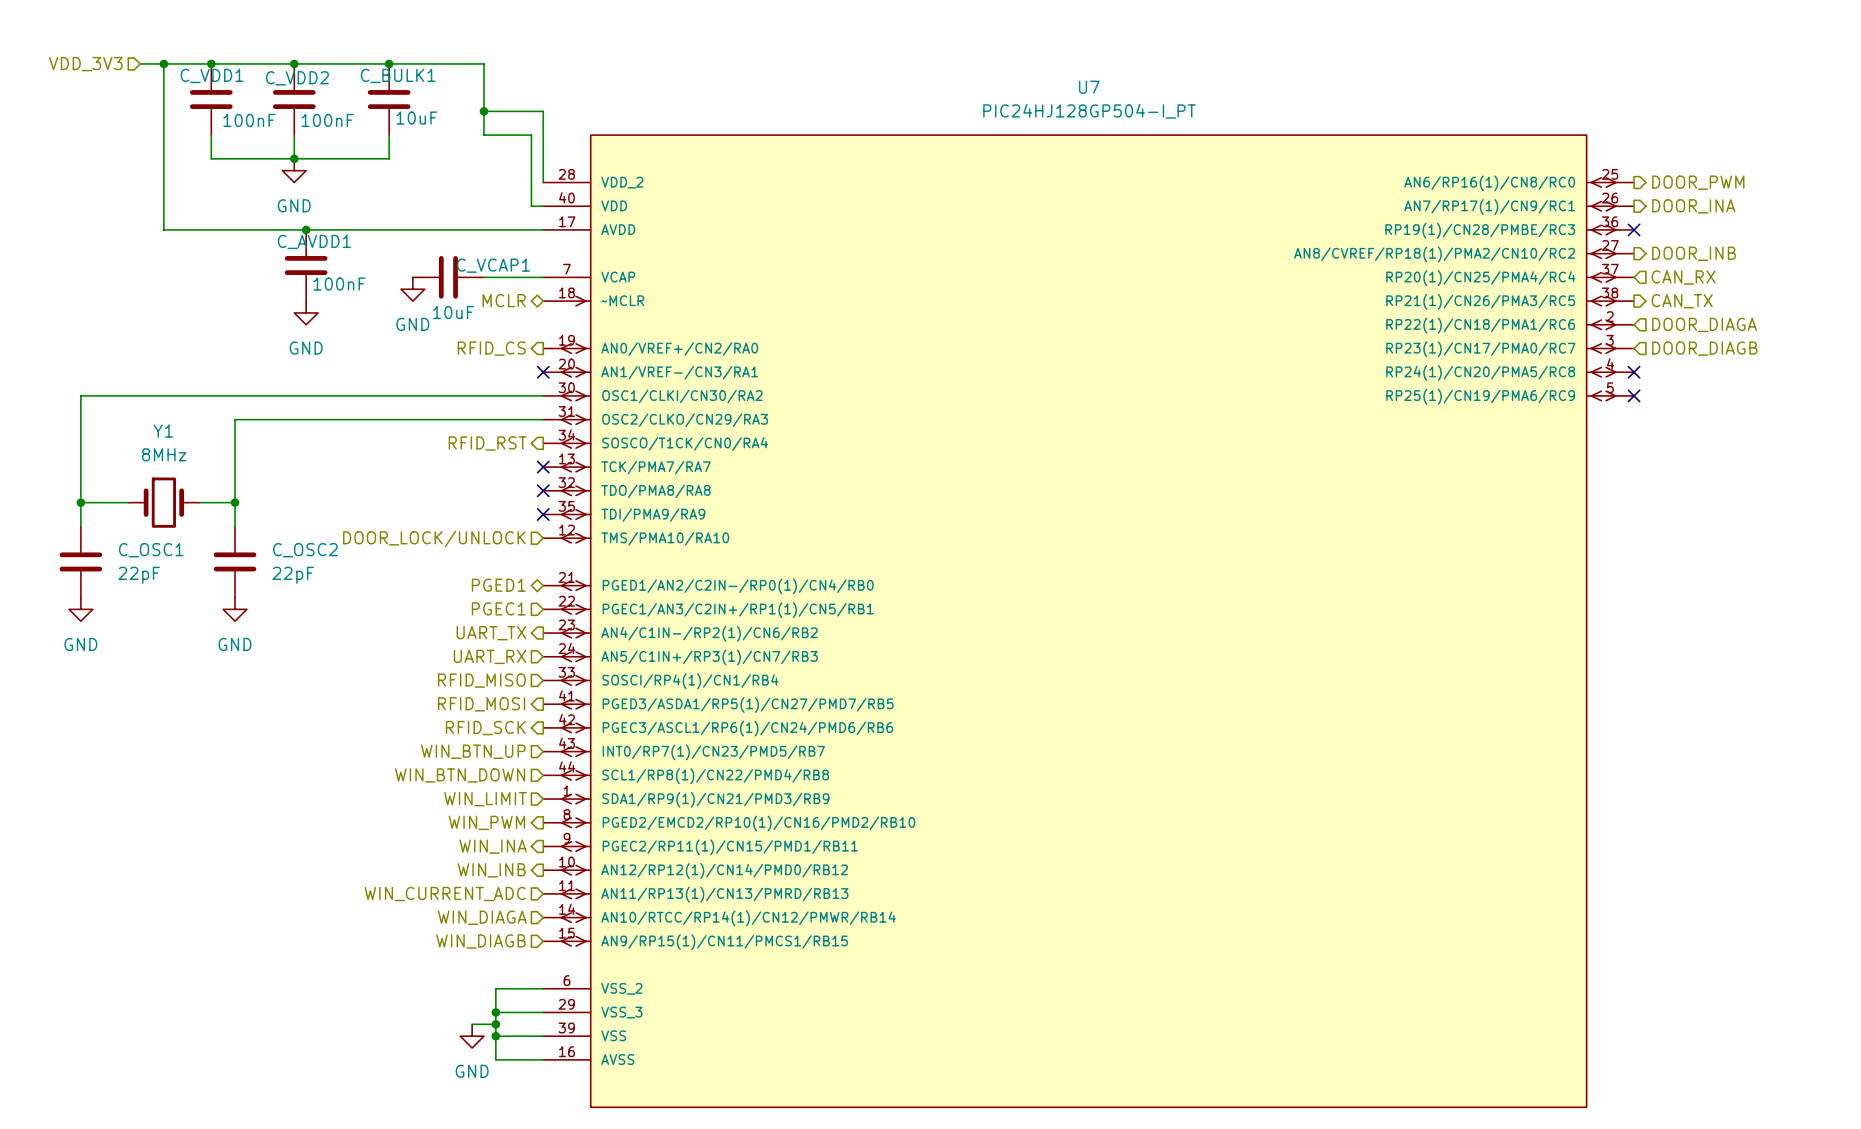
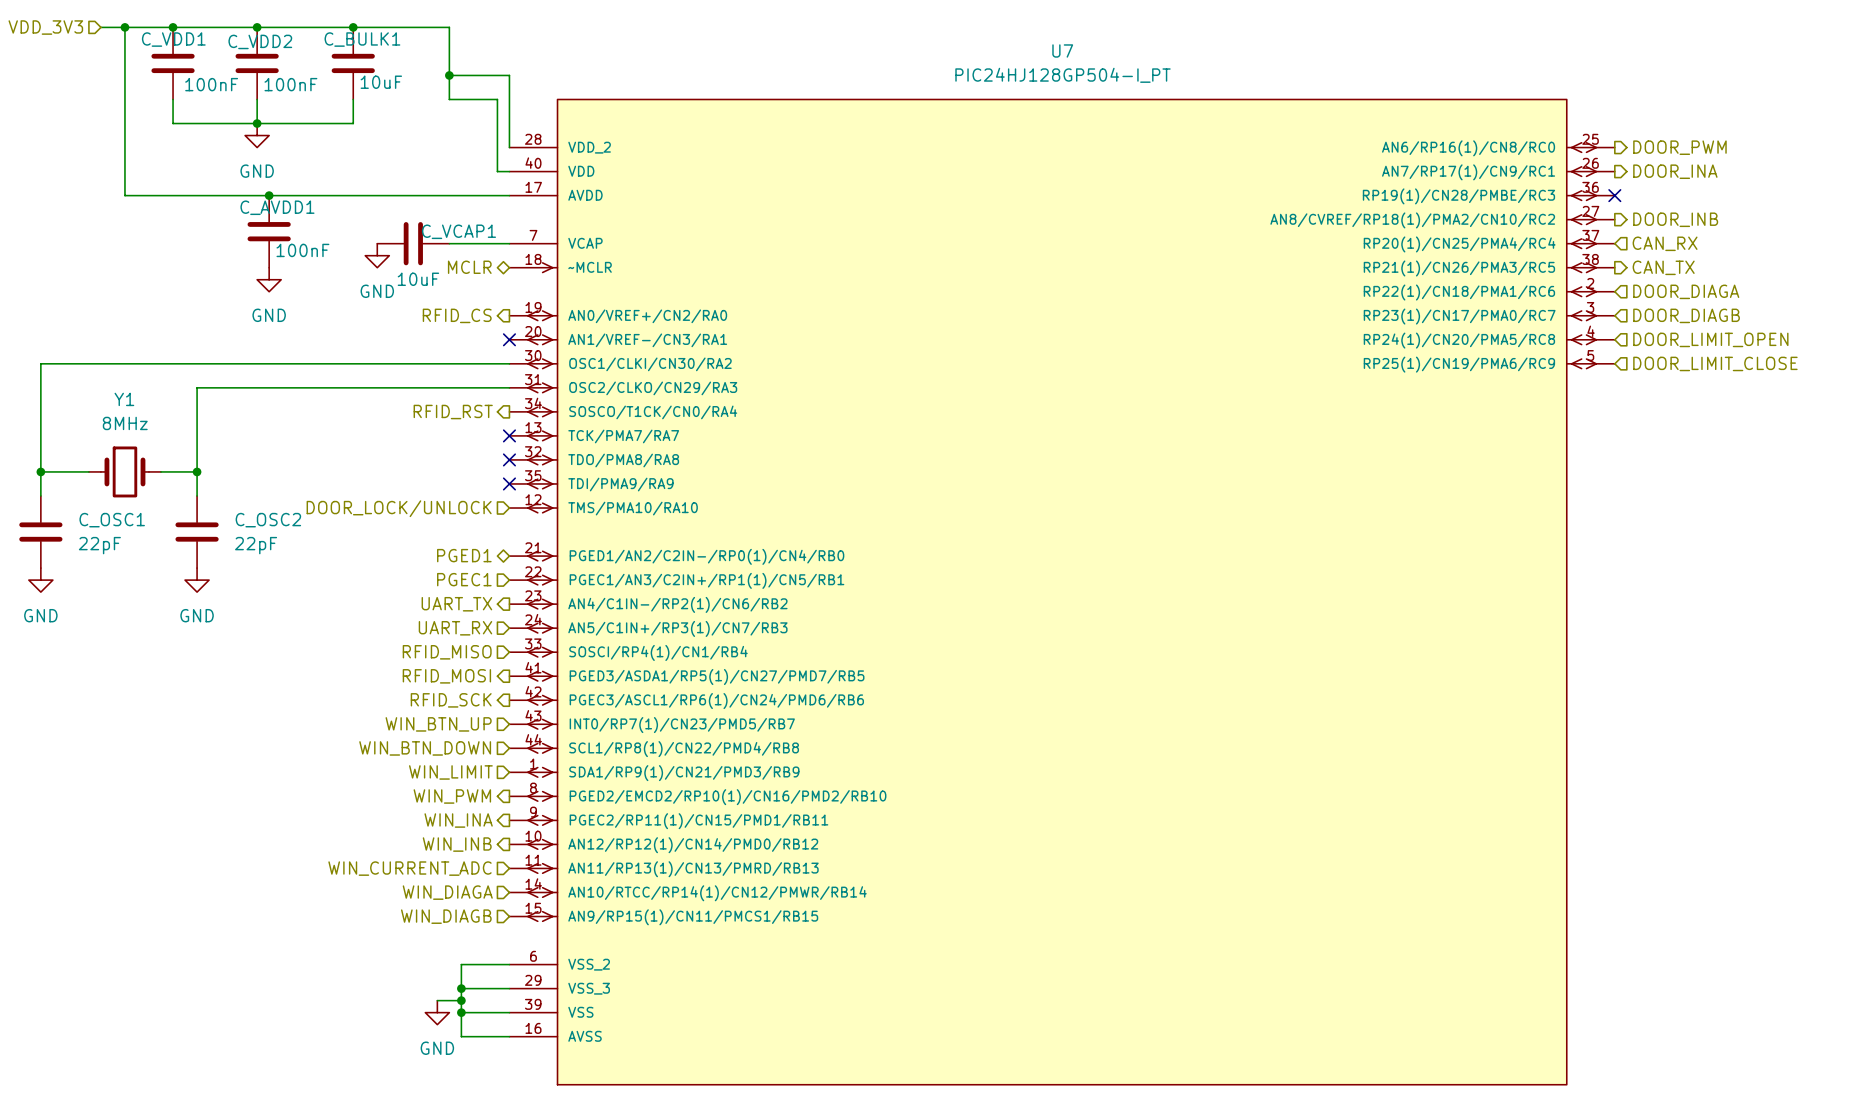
no-connect mark: (1634, 372) -> none
hierarchical label: none -> DOOR_LIMIT_OPEN (1710, 339)
no-connect mark: (1634, 395) -> none
hierarchical label: none -> DOOR_LIMIT_CLOSE (1715, 363)

